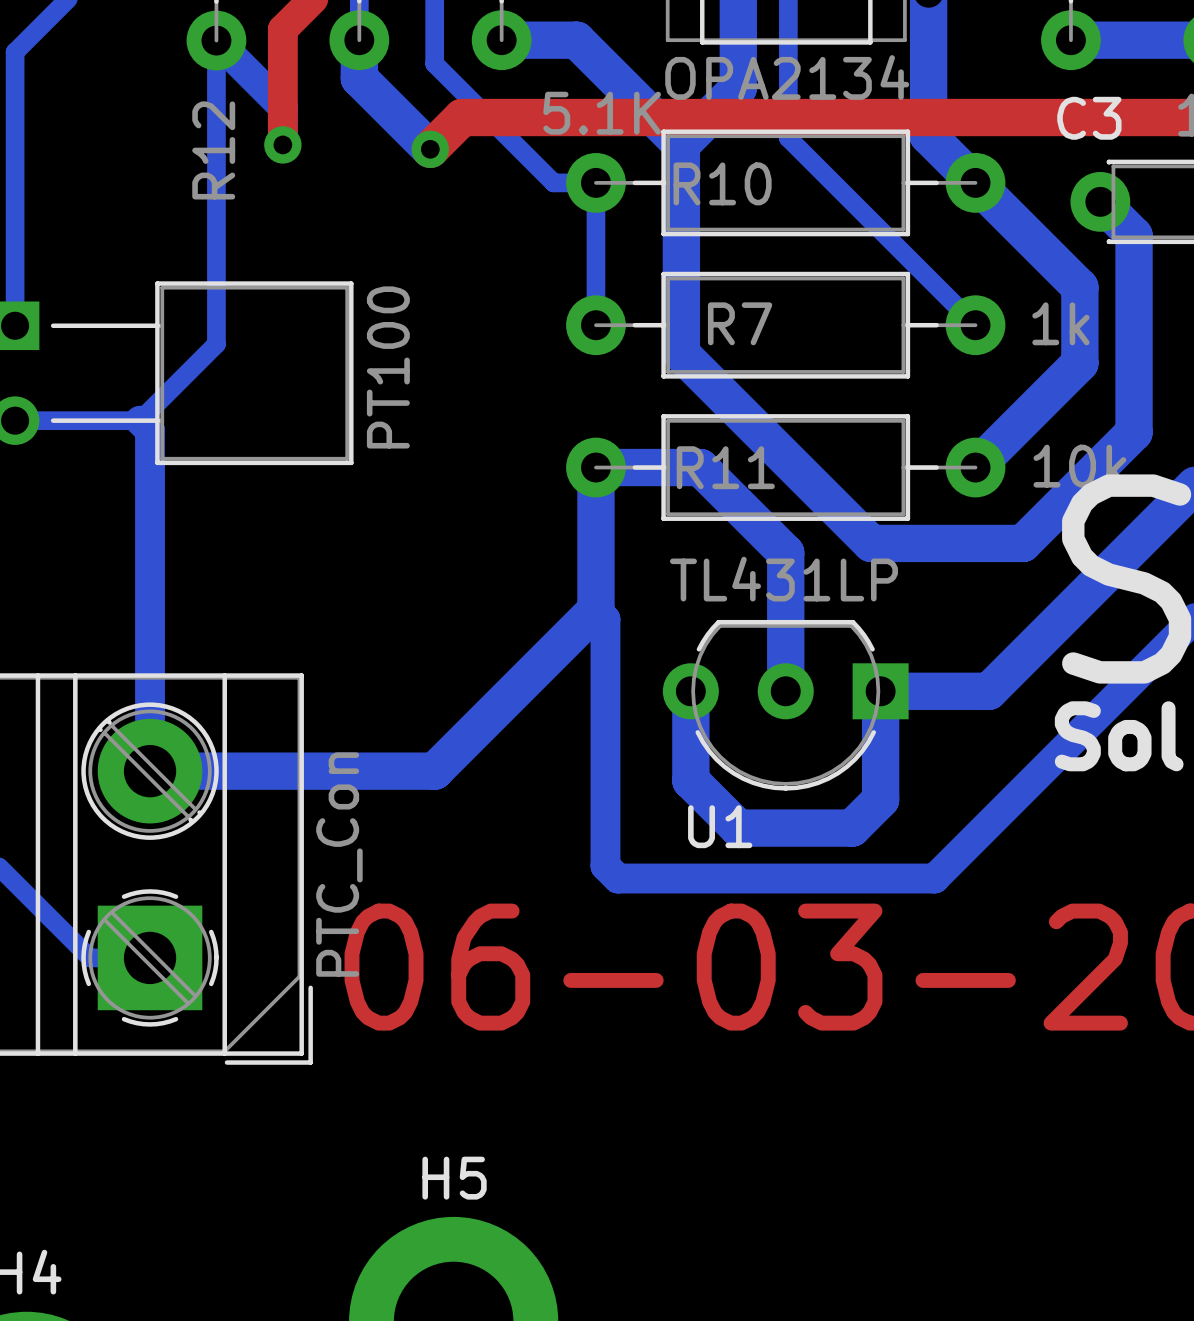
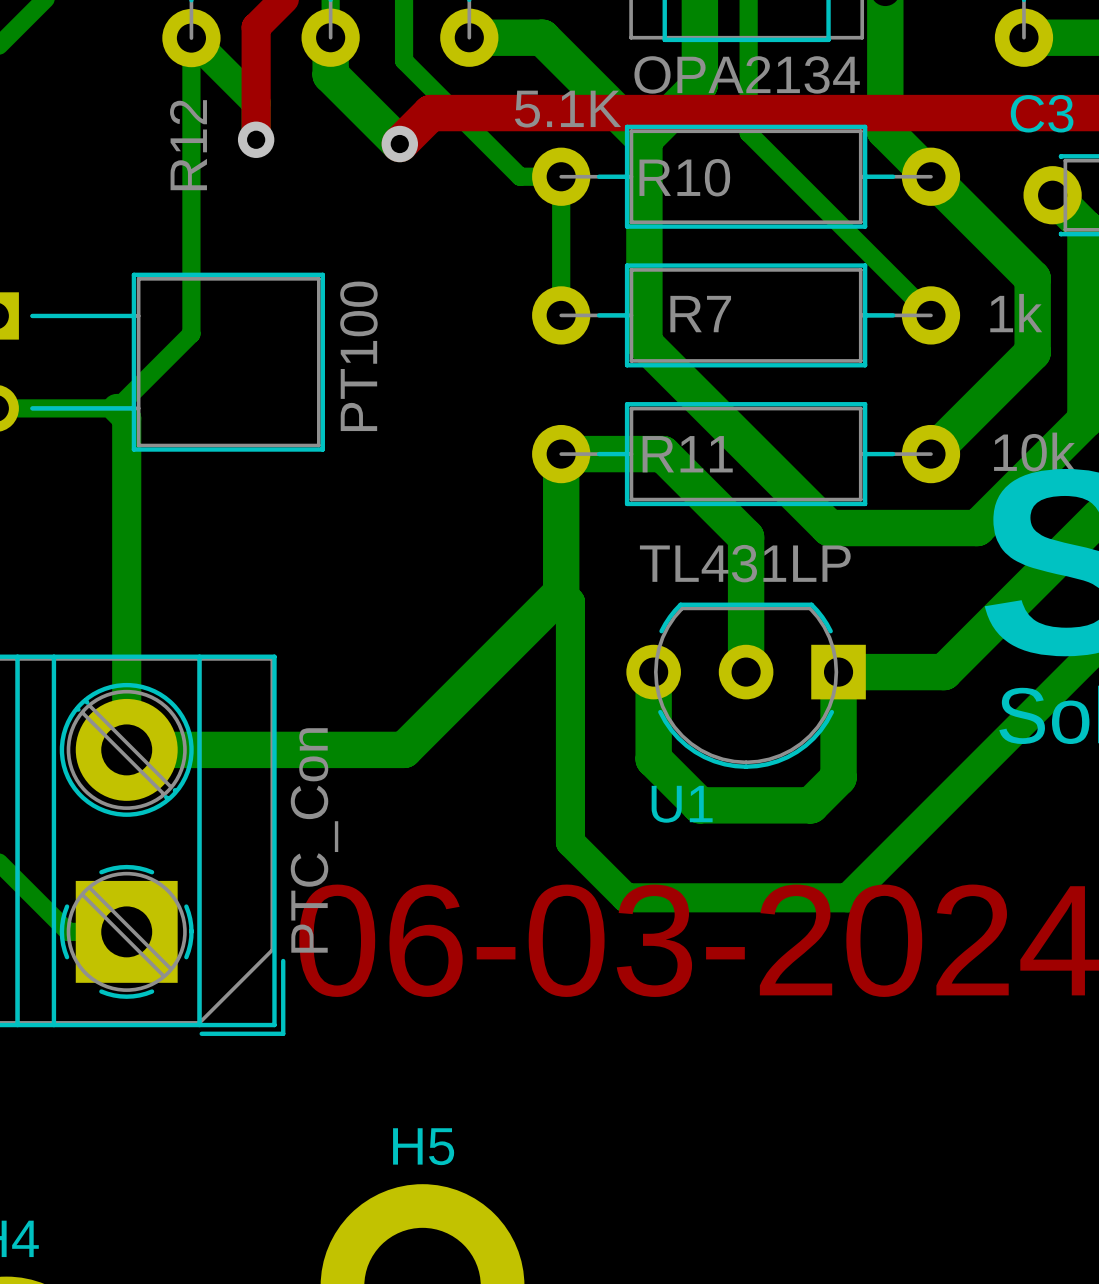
bottom track: (617, 878) (934, 878) -> (582, 854) (625, 897) (847, 897) (891, 854)

